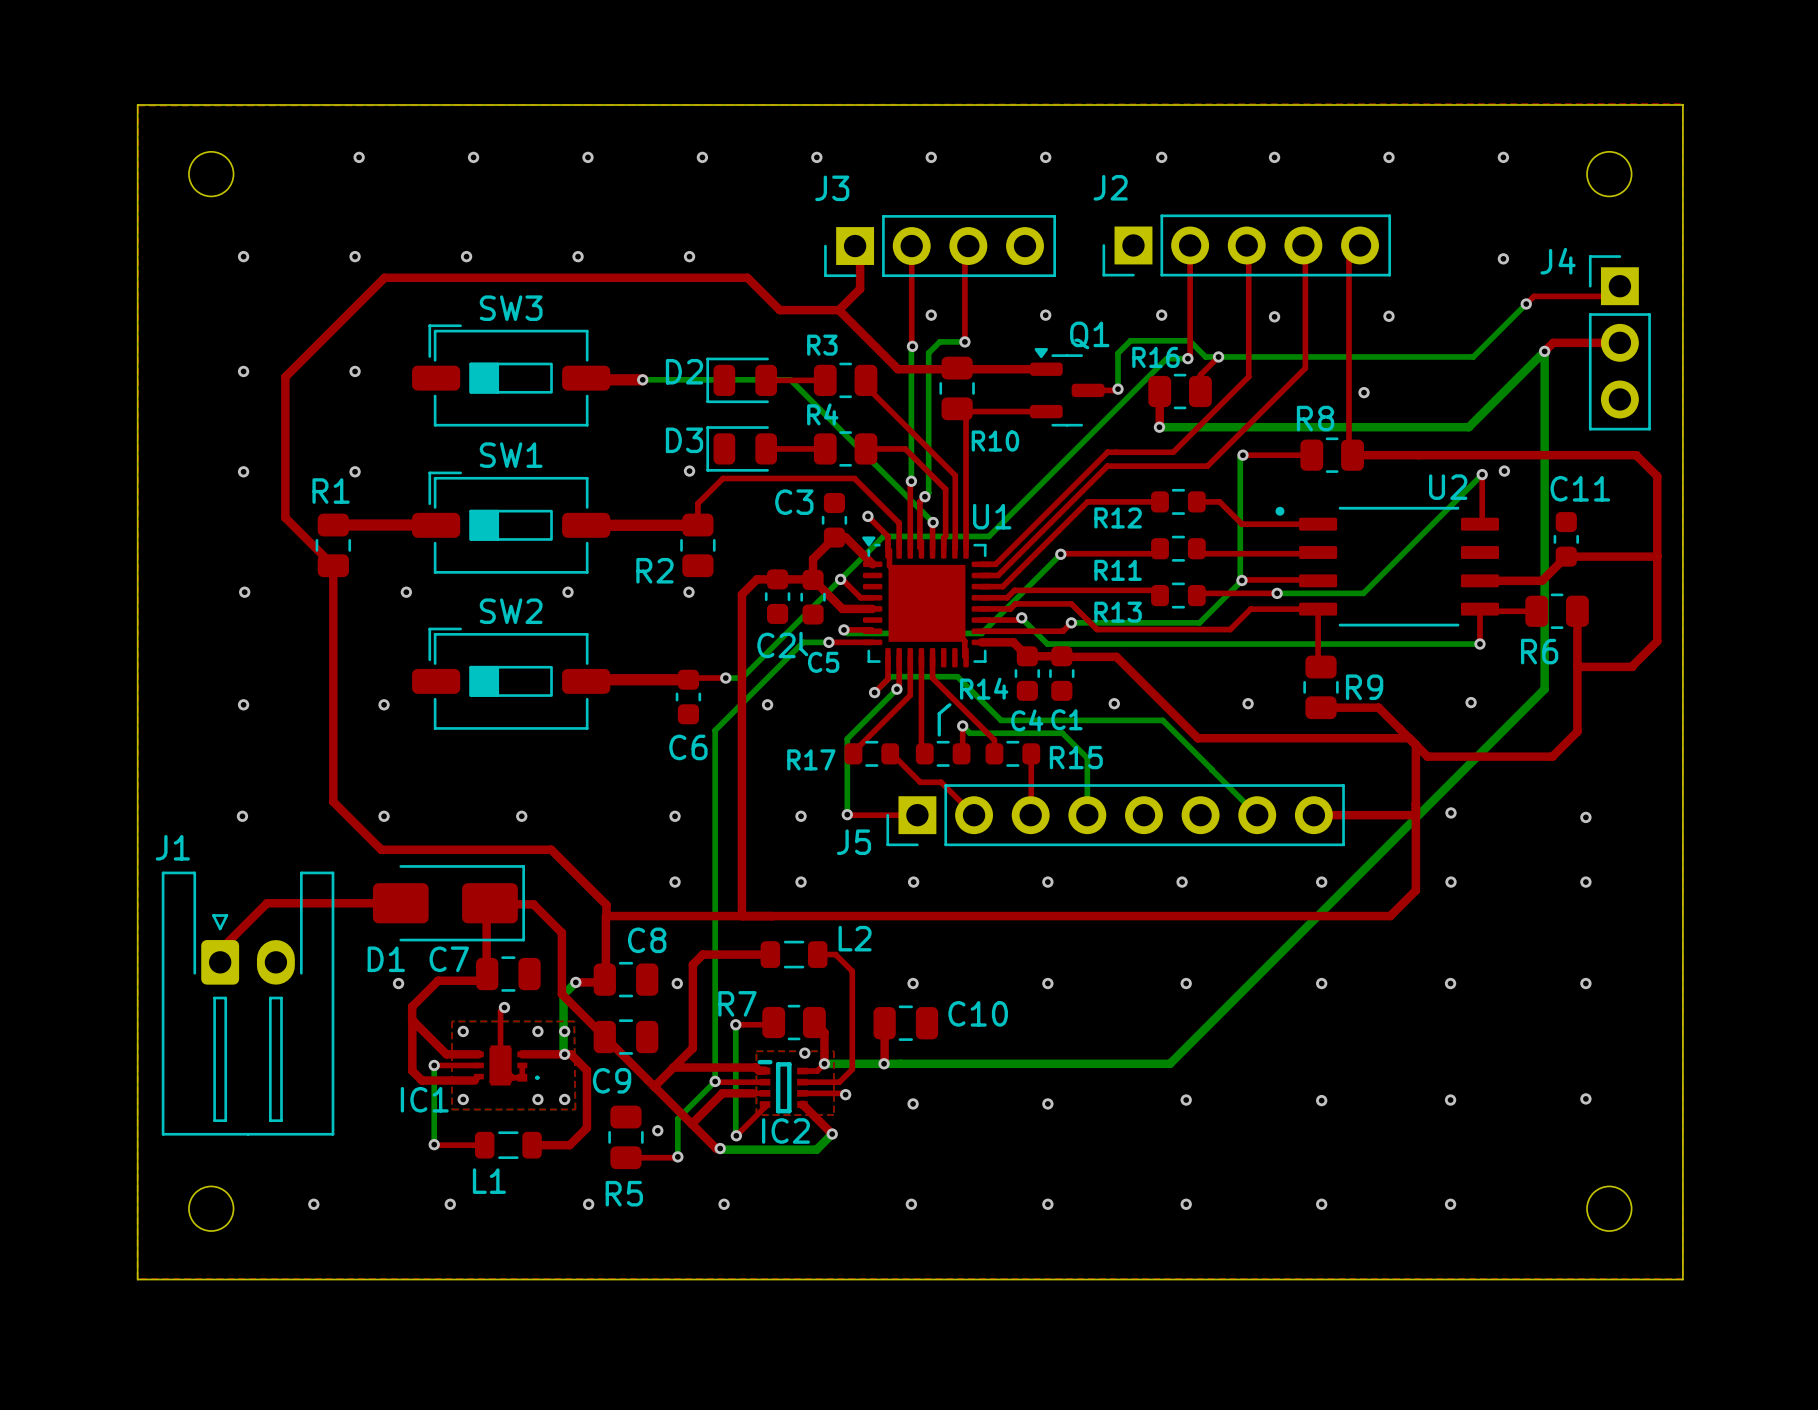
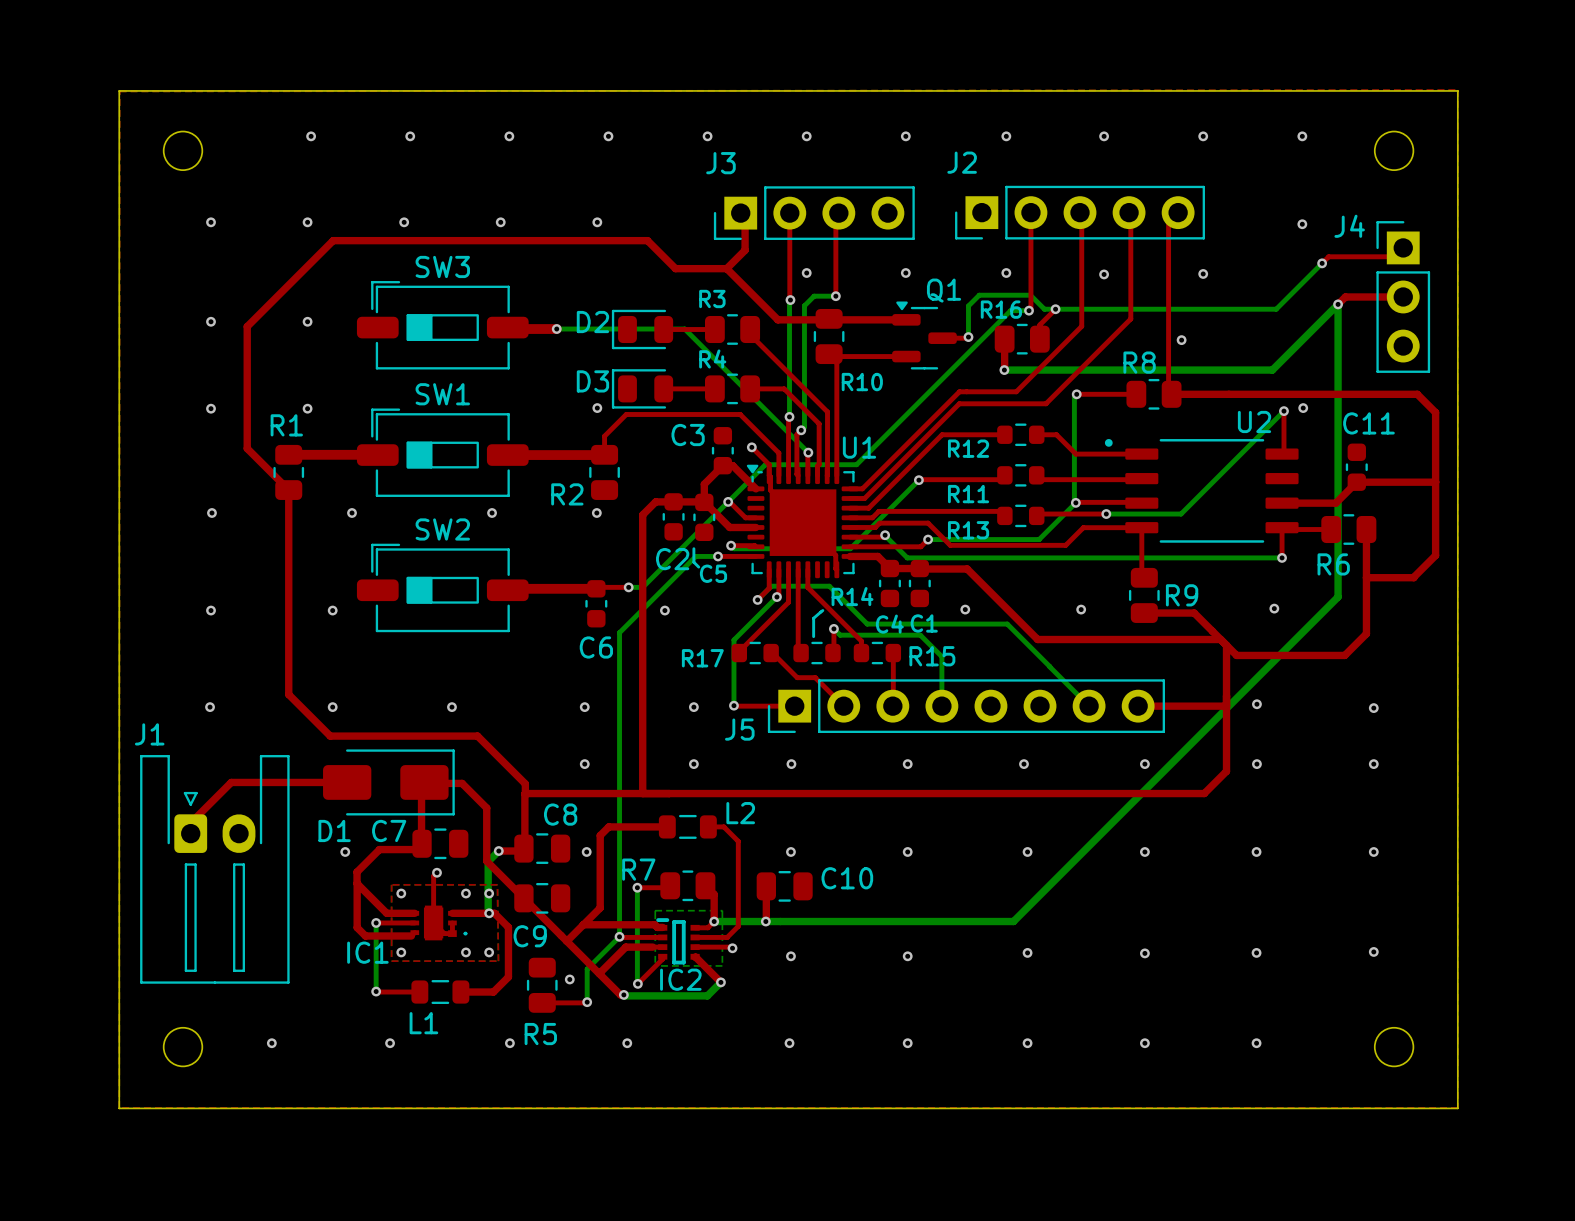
top zone outline: (756, 1051) (833, 1051) (833, 1115) (756, 1115) (756, 1051) -> none
via: (804, 1053) -> none

